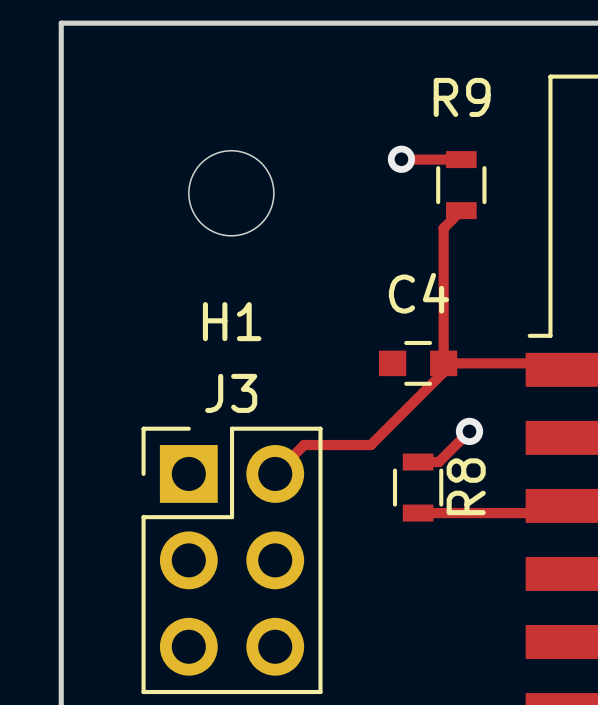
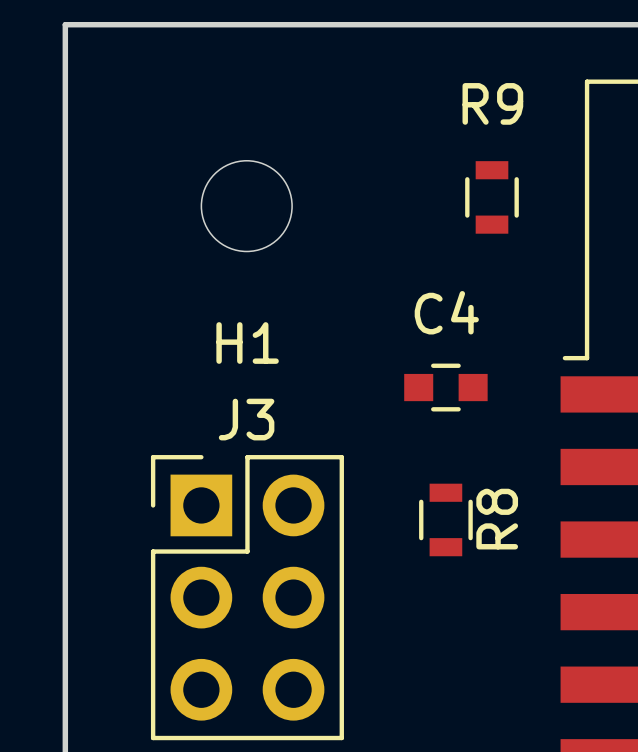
track: (401, 159) (461, 159) -> none
via: (401, 159) -> none
track: (461, 210) (443, 228) (443, 372) (370, 445) (304, 445) (275, 473) -> none
track: (443, 363) (561, 363) (568, 369) -> none
track: (469, 431) (438, 462) (418, 462) -> none
via: (469, 431) -> none
track: (568, 505) (561, 513) (418, 513) -> none

